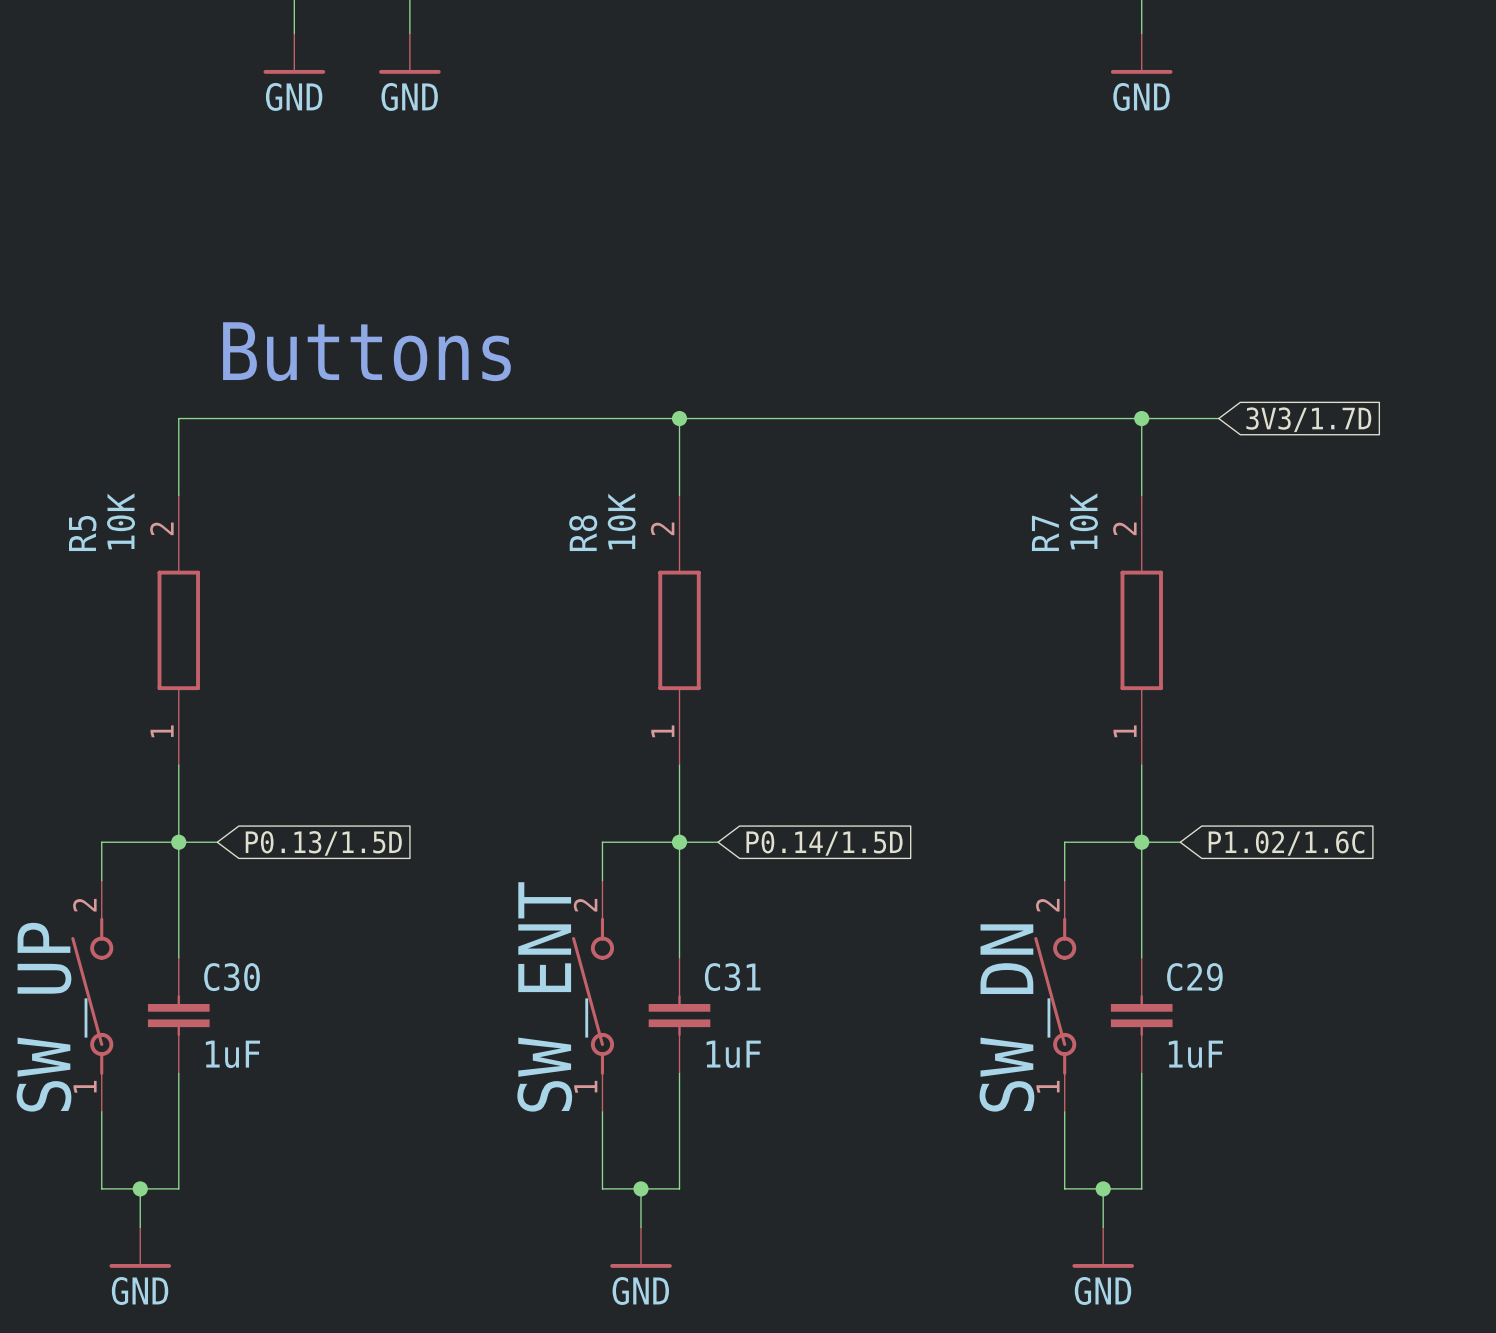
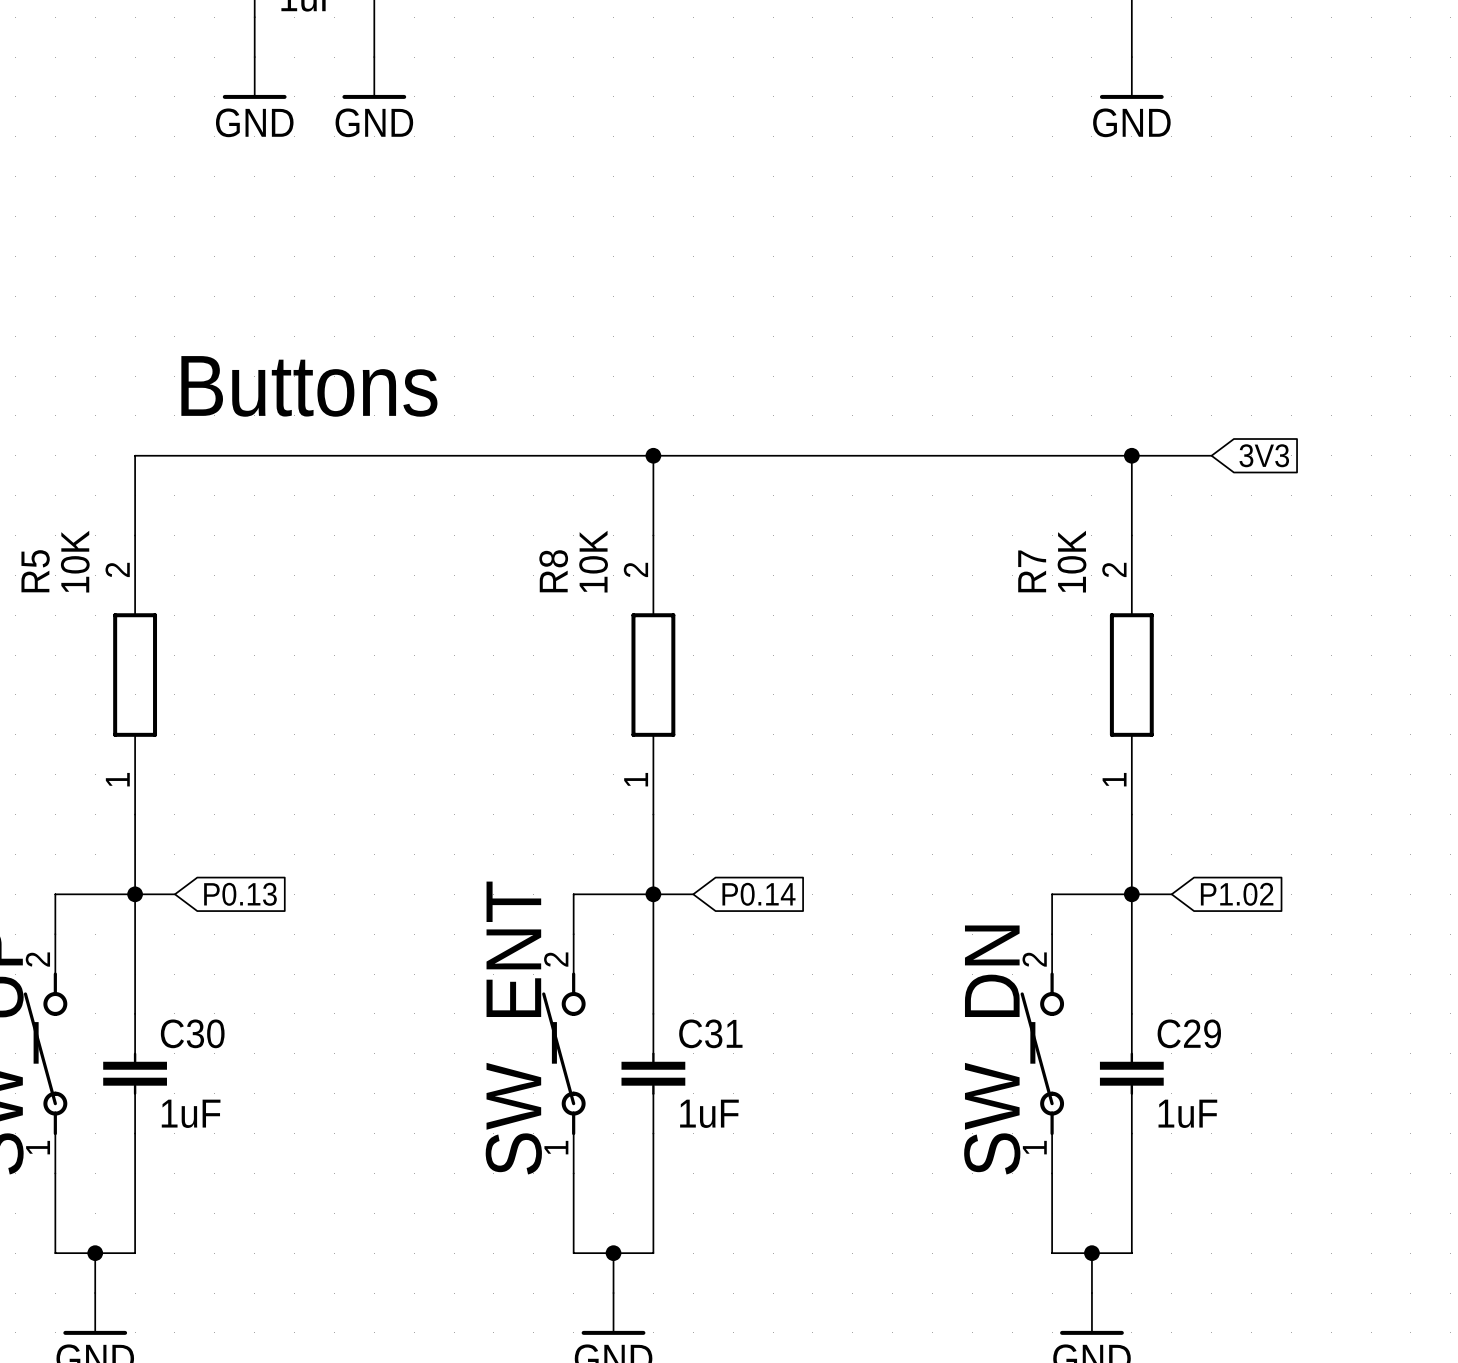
global label: 3V3/1.7D (1308, 419) -> 3V3 (1264, 455)
global label: P0.13/1.5D (323, 843) -> P0.13 (240, 894)
global label: P0.14/1.5D (824, 843) -> P0.14 (758, 894)
global label: P1.02/1.6C (1286, 843) -> P1.02 (1237, 894)

